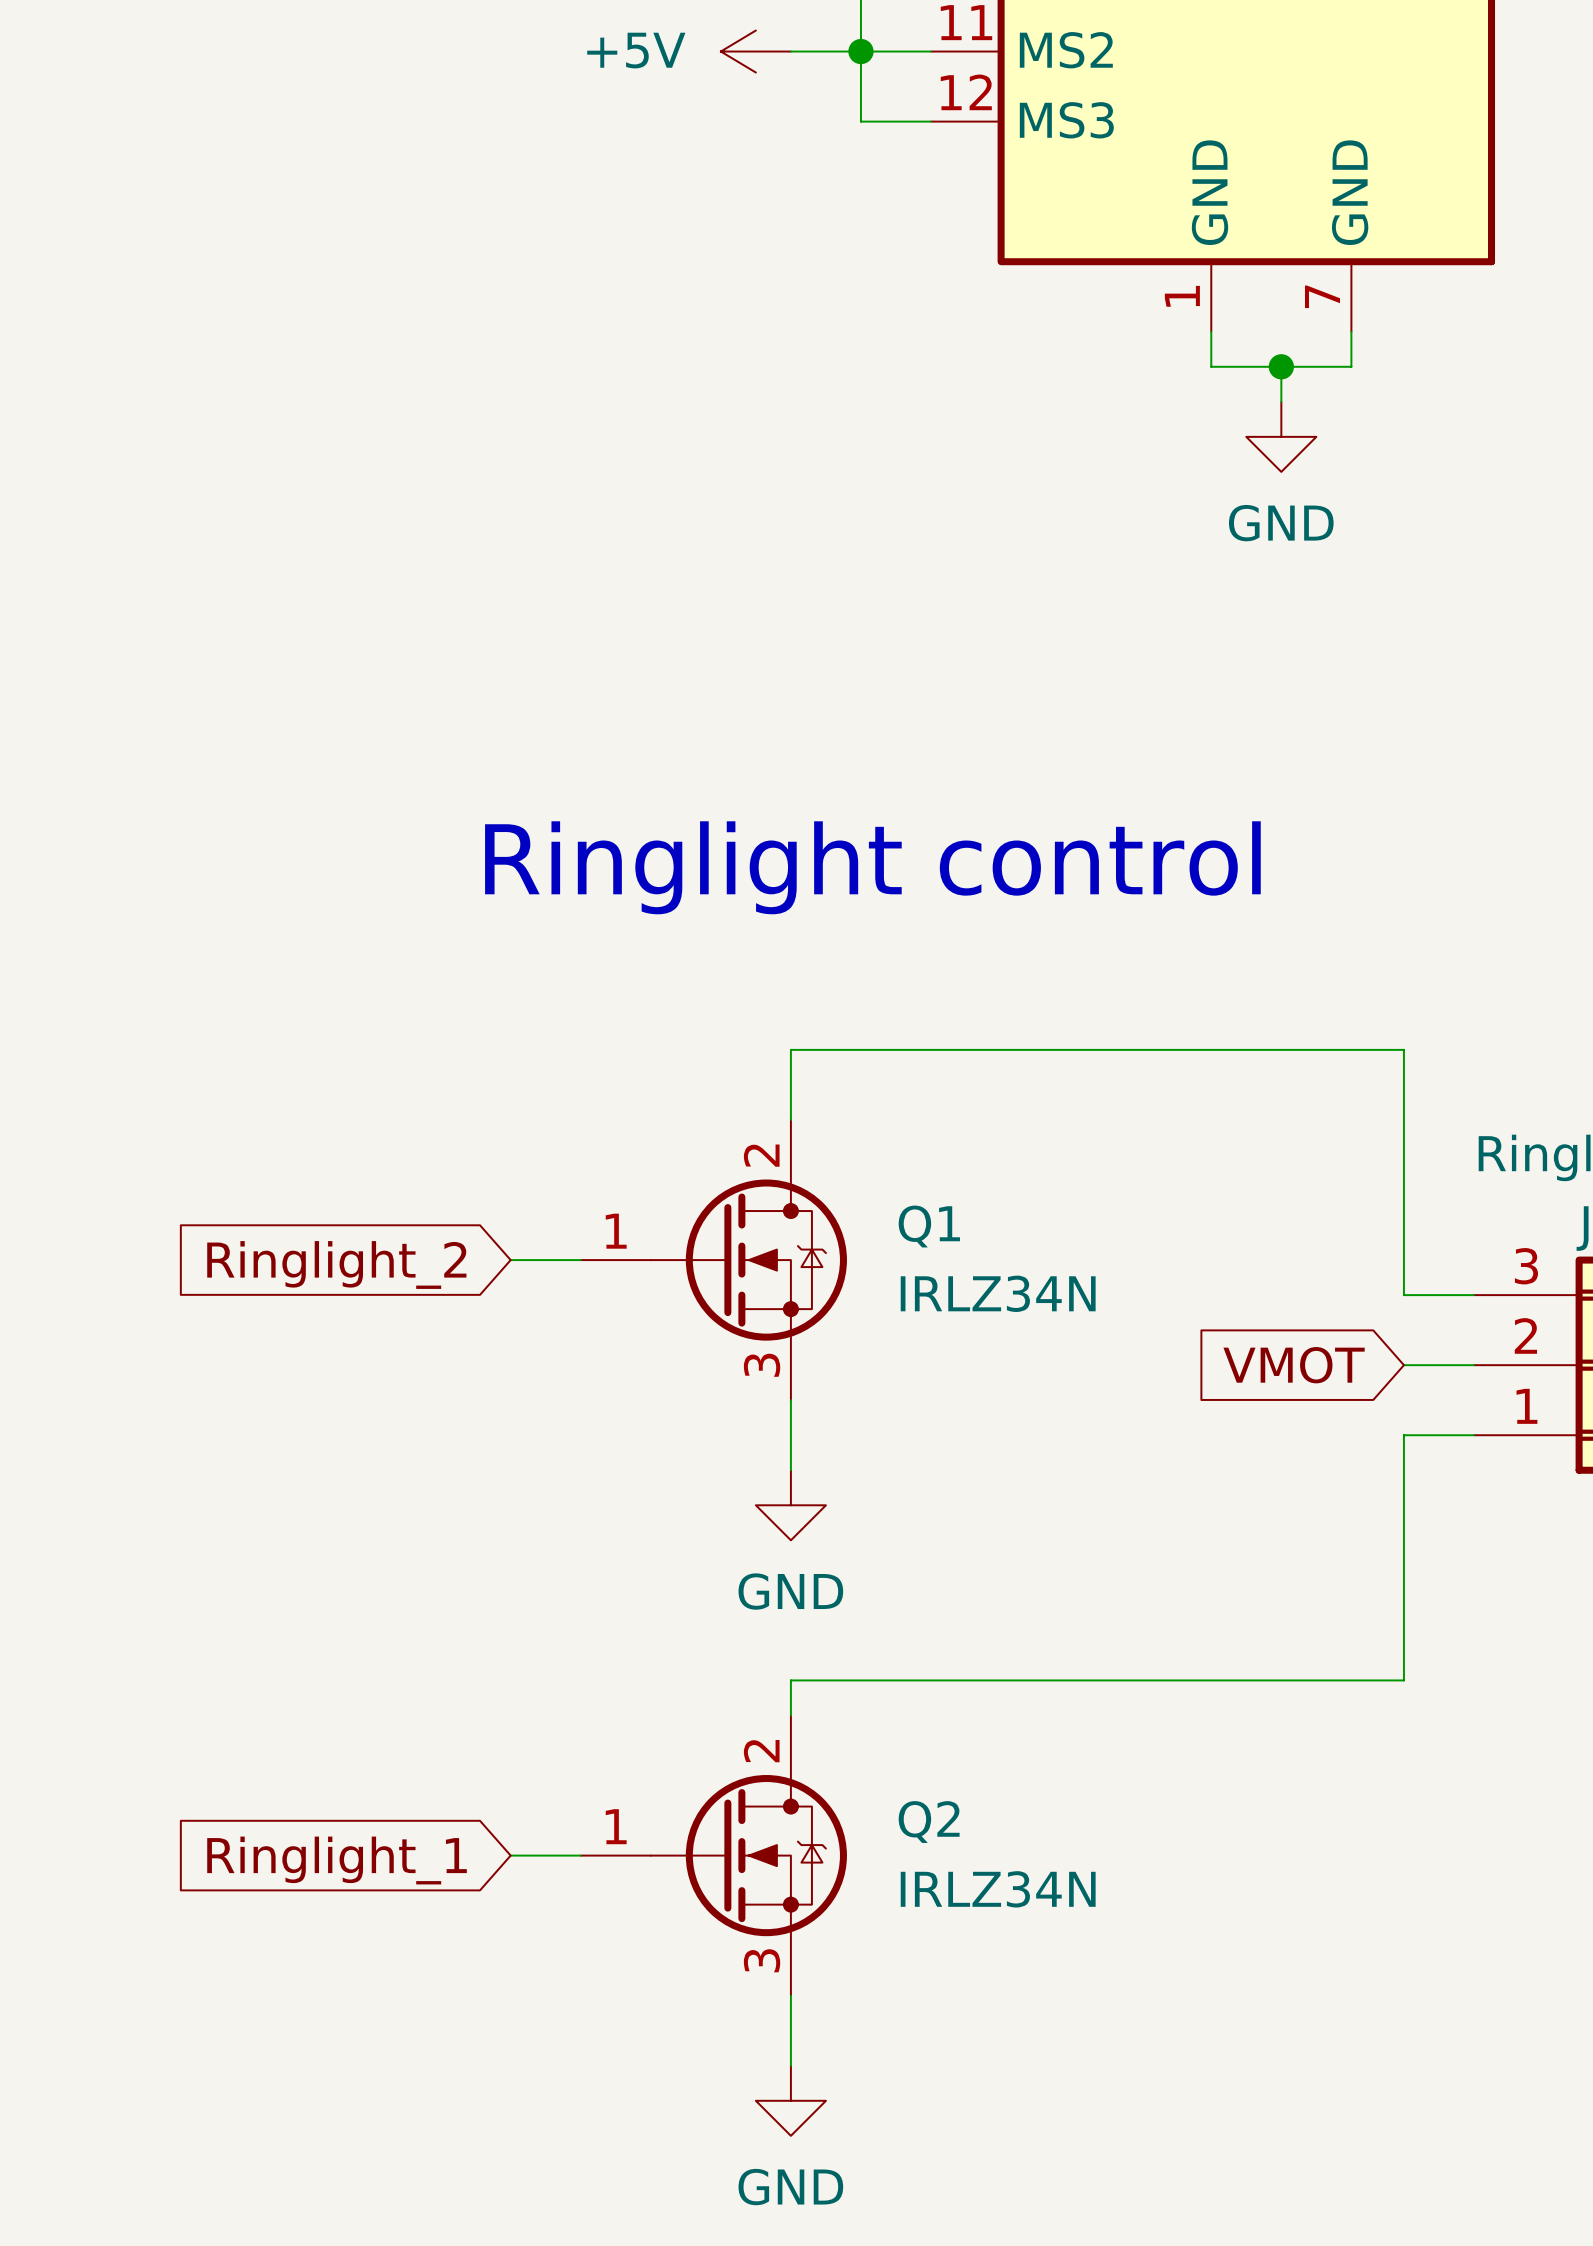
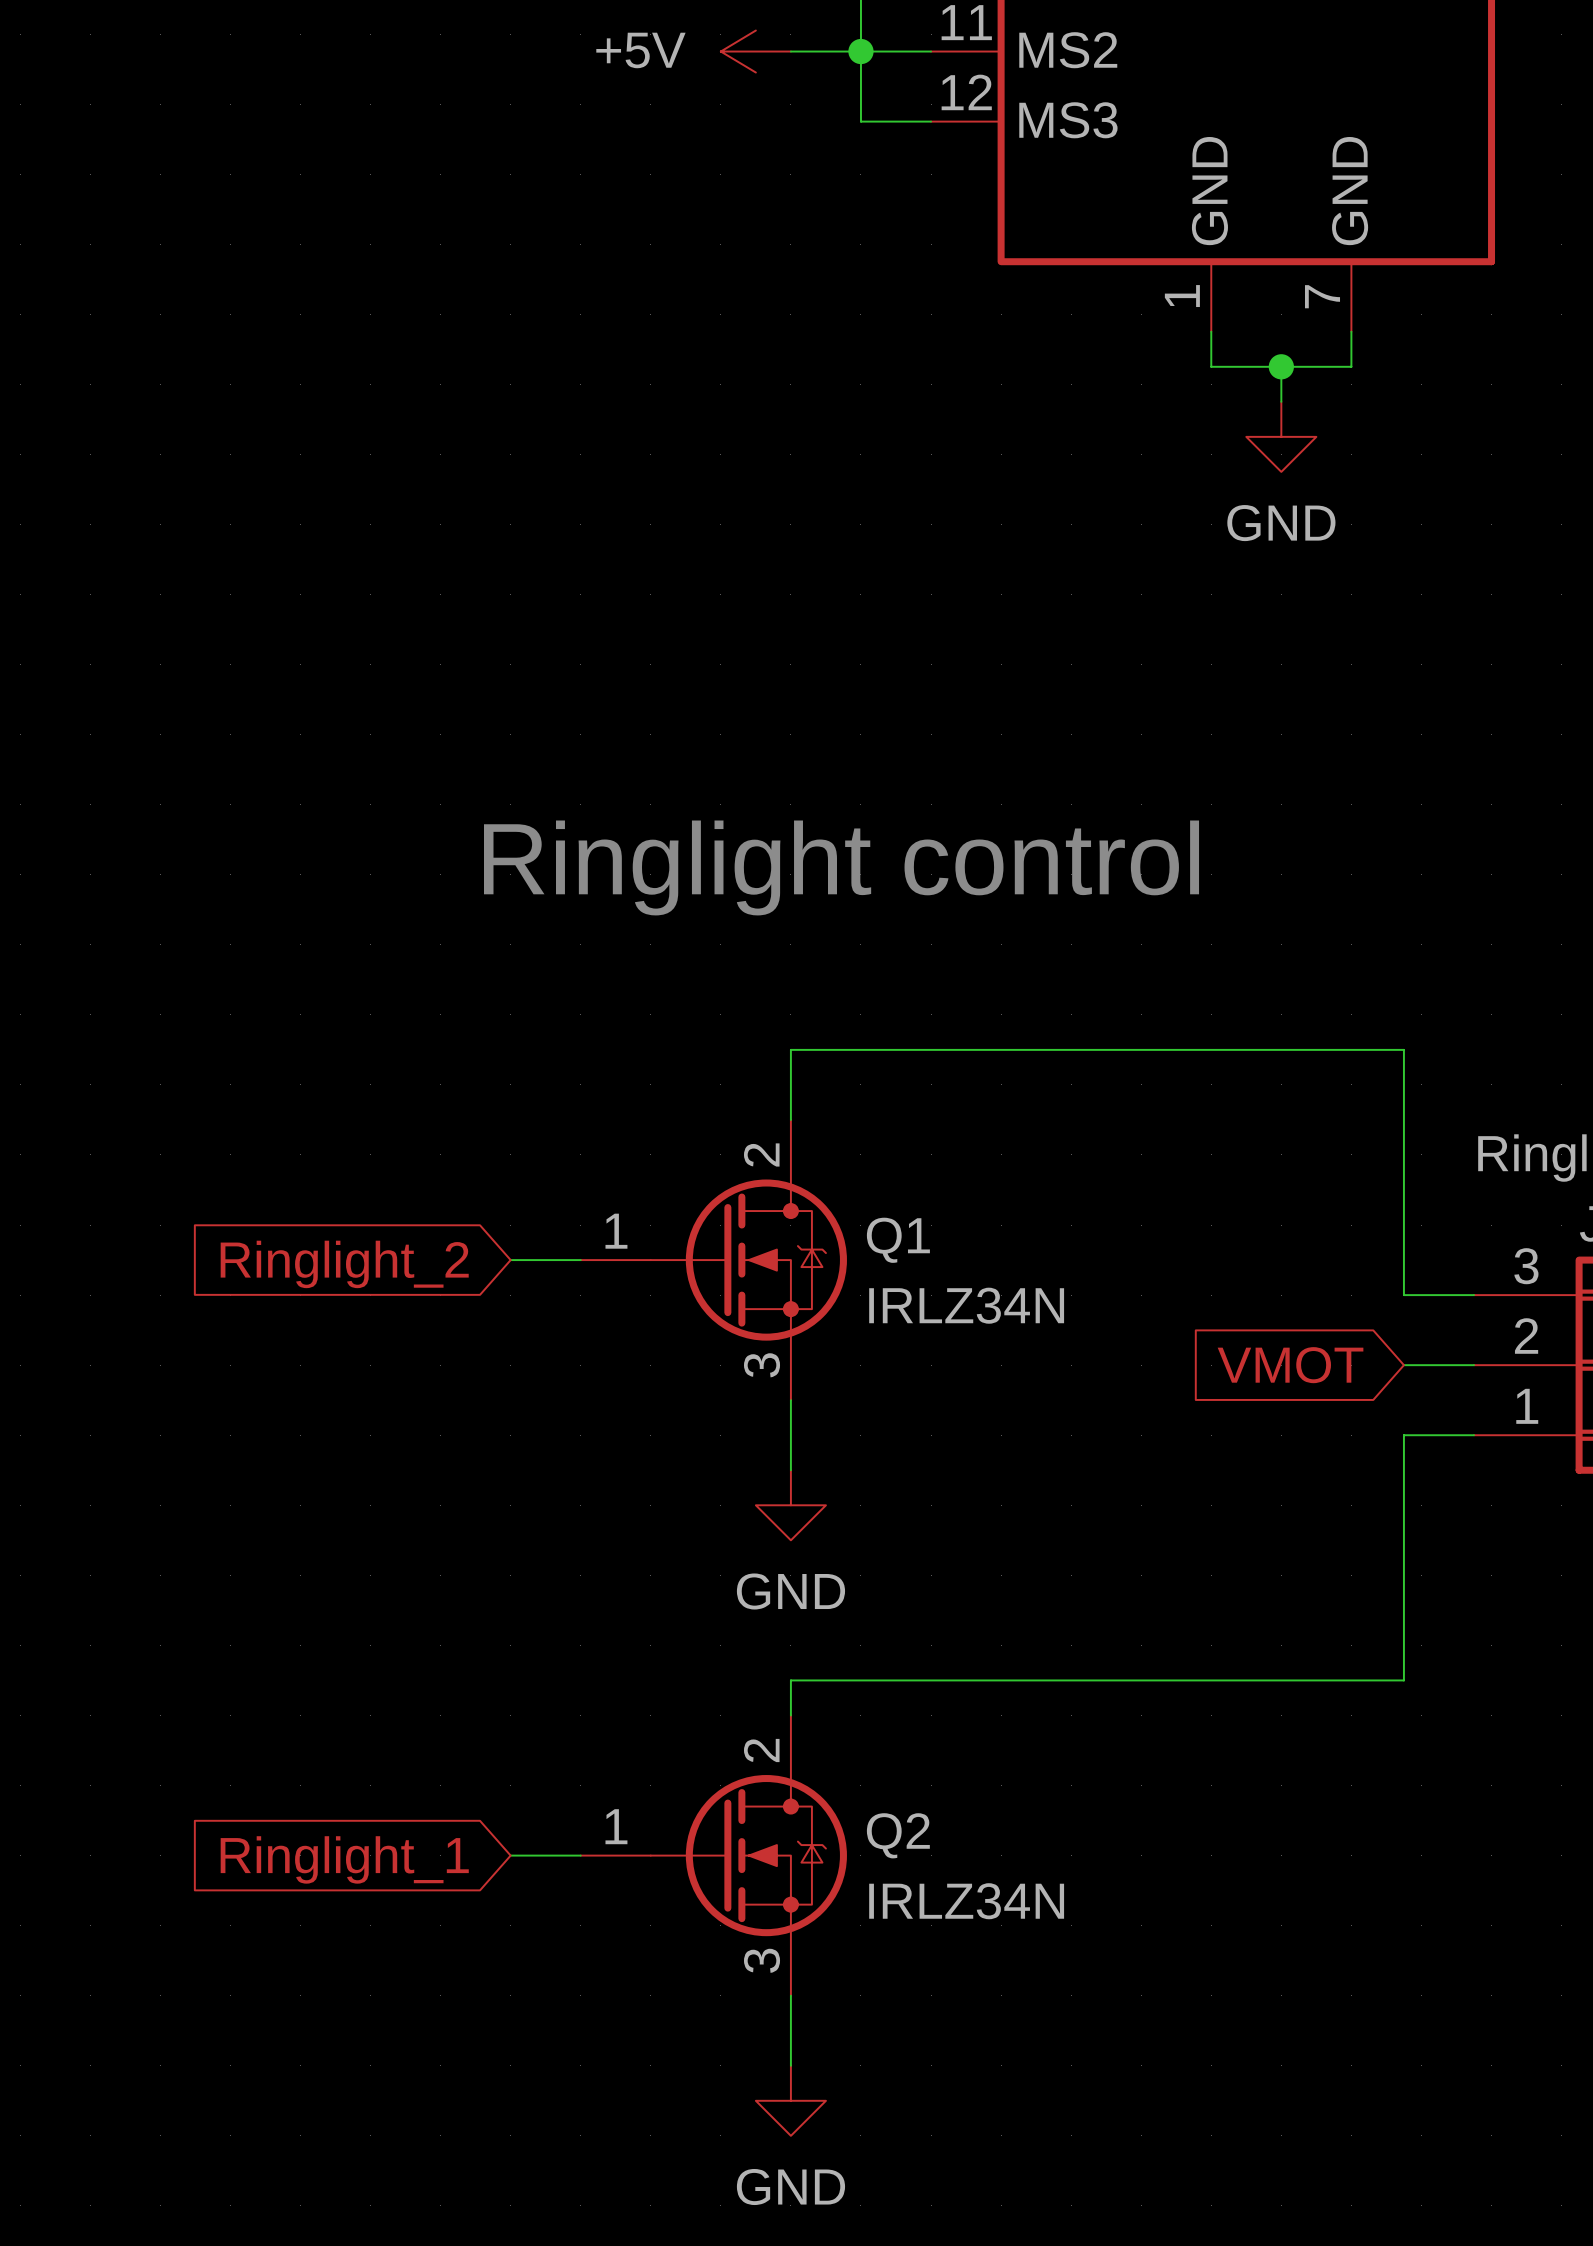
Q1 name position: Q1 (929, 1226) -> Q1 (898, 1240)
Q1 value position: IRLZ34N (998, 1293) -> IRLZ34N (966, 1305)
Q2 name position: Q2 (929, 1822) -> Q2 (898, 1835)
Q2 value position: IRLZ34N (998, 1889) -> IRLZ34N (966, 1901)

